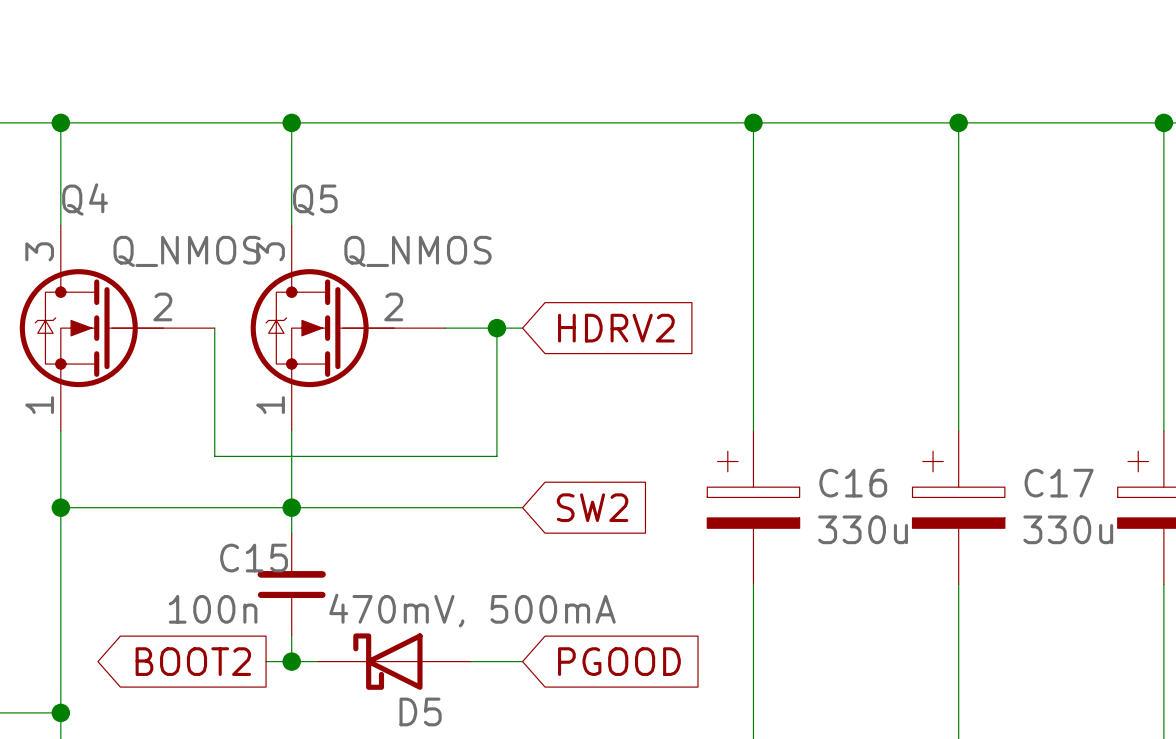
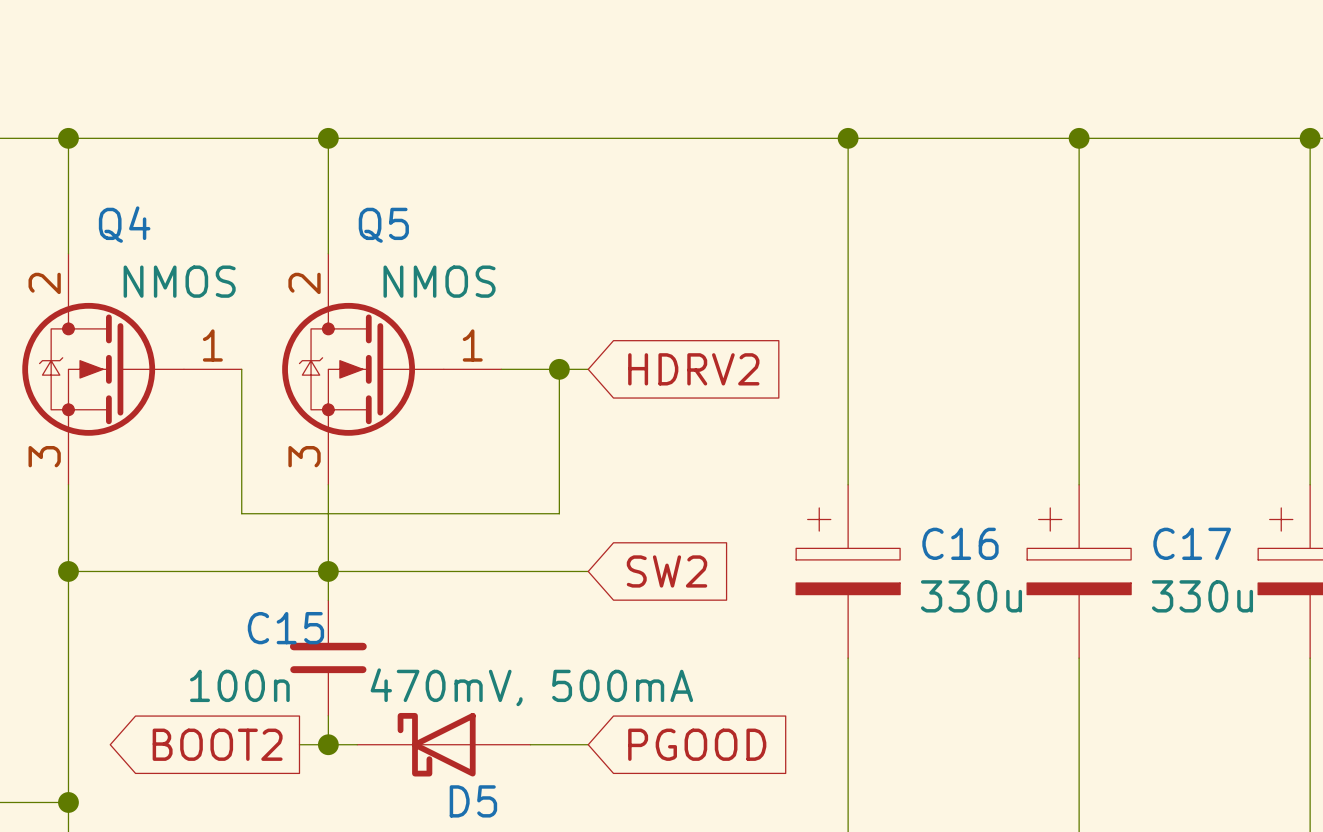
Q4 symbol: [19, 225, 215, 431] -> [22, 253, 242, 485]
Q5 symbol: [250, 225, 446, 431] -> [282, 253, 502, 485]
Q4 value: Q_NMOS (187, 251) -> NMOS (179, 281)
Q5 value: Q_NMOS (417, 251) -> NMOS (439, 281)

